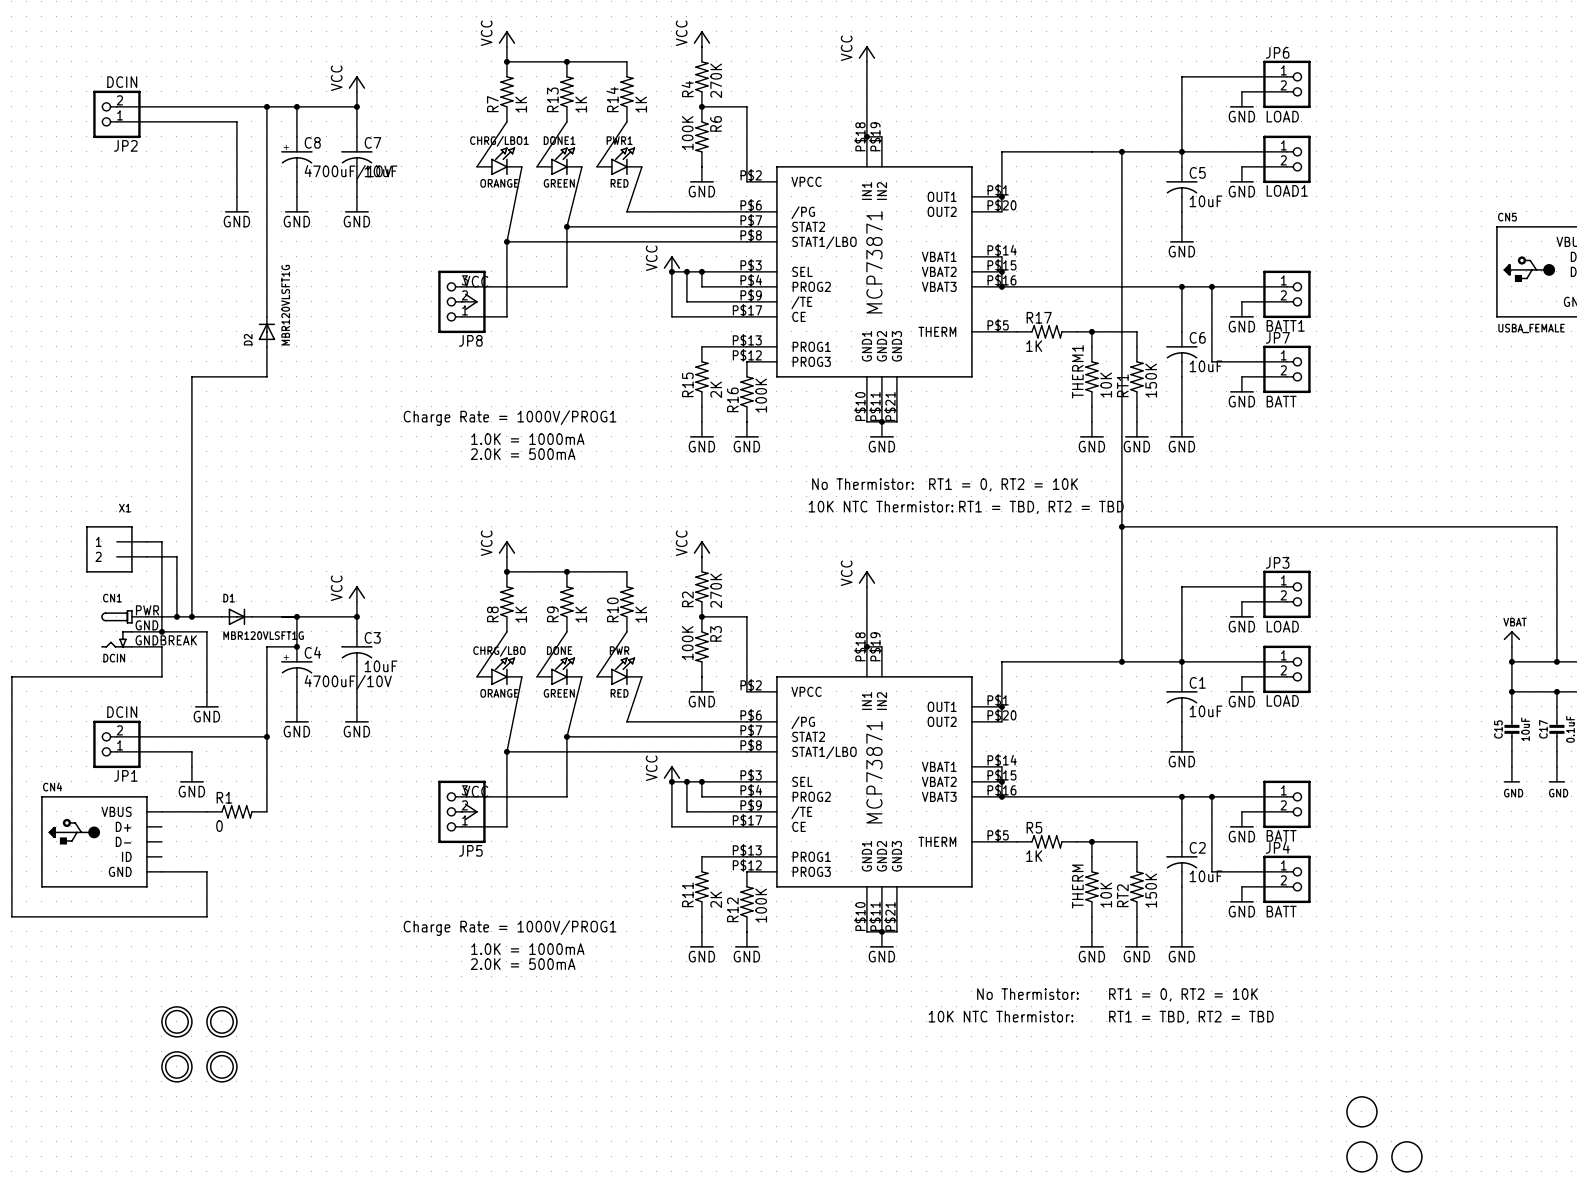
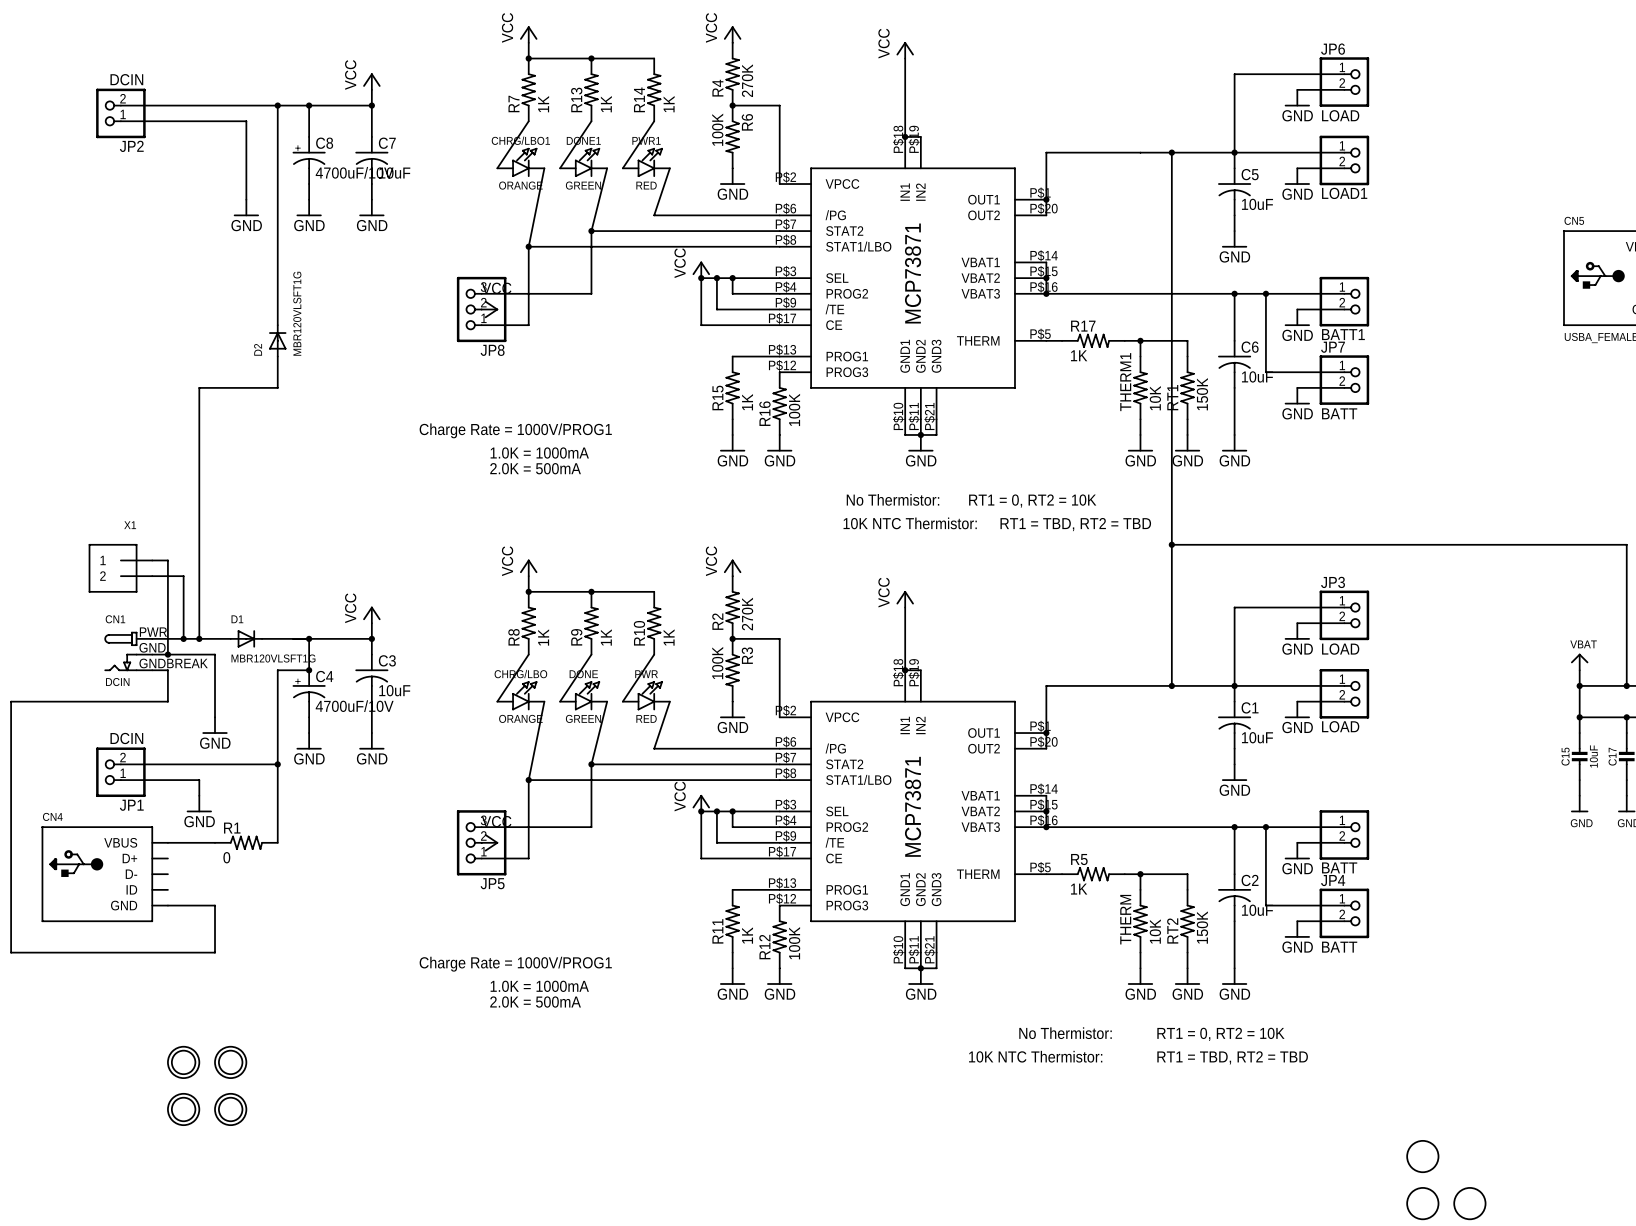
R15 value: 2K (716, 389) -> 1K (747, 402)
R11 value: 2K (716, 899) -> 1K (747, 935)

